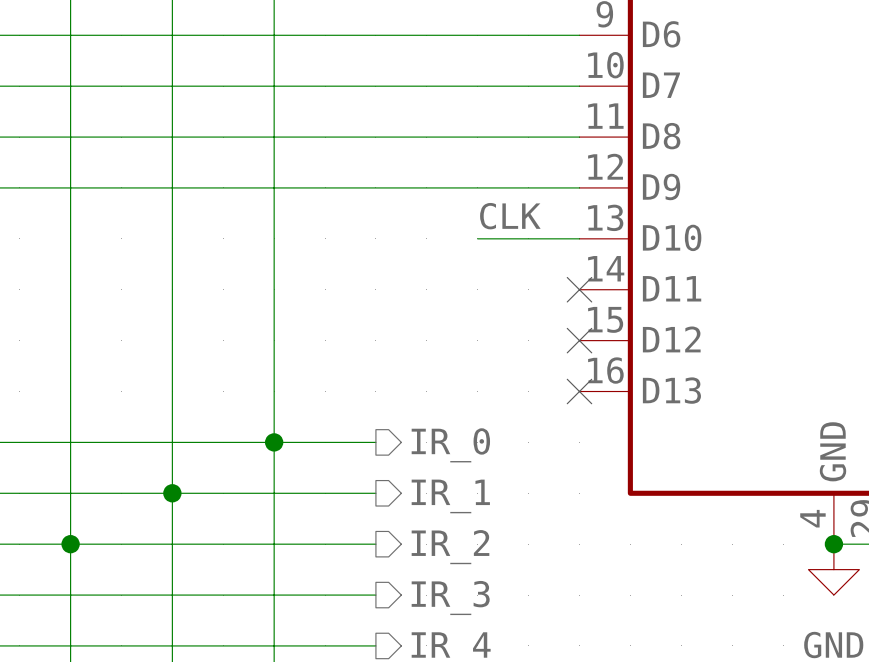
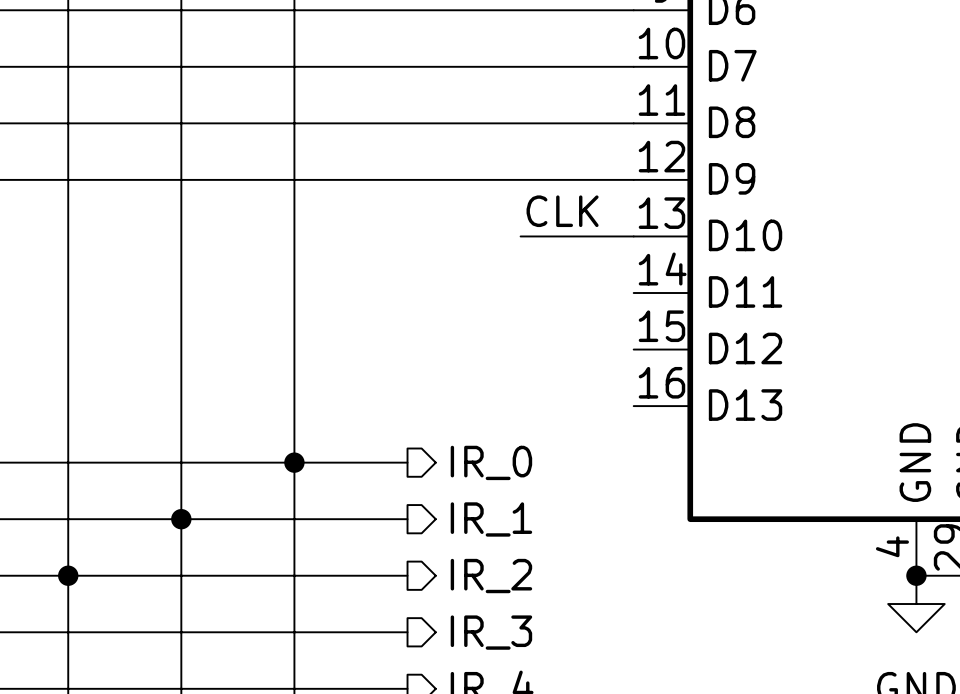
no-connect mark: (579, 289) -> none
no-connect mark: (579, 340) -> none
no-connect mark: (579, 391) -> none

